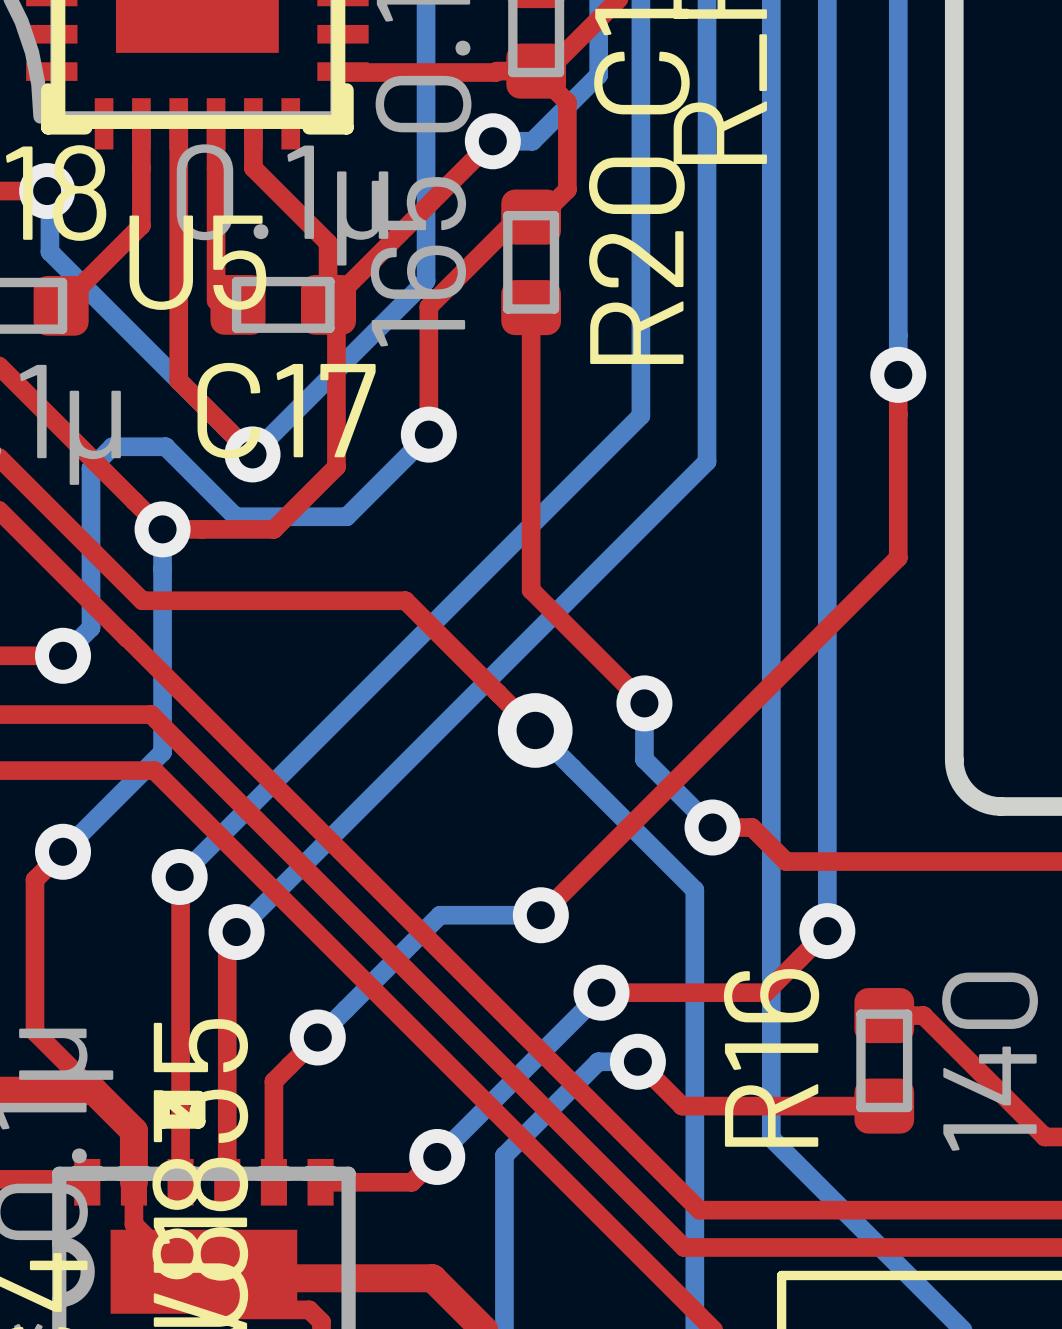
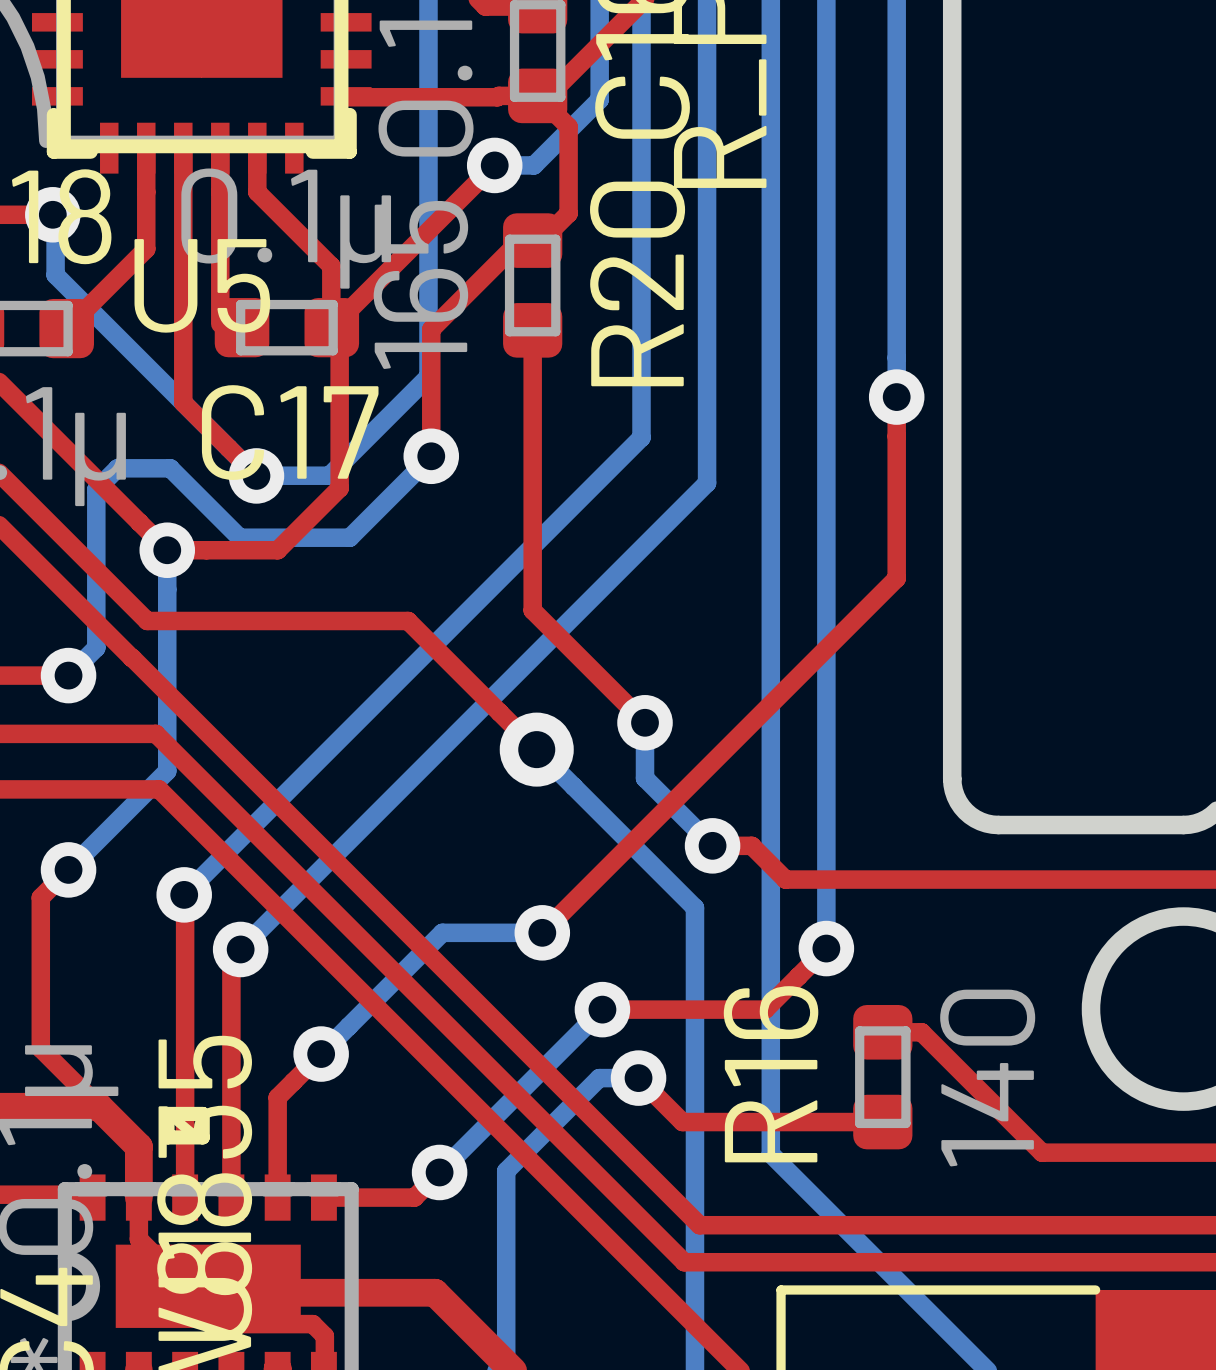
bottom track: (426, 280) (252, 454) -> (428, 303) (428, 376) (329, 475) (256, 475)

